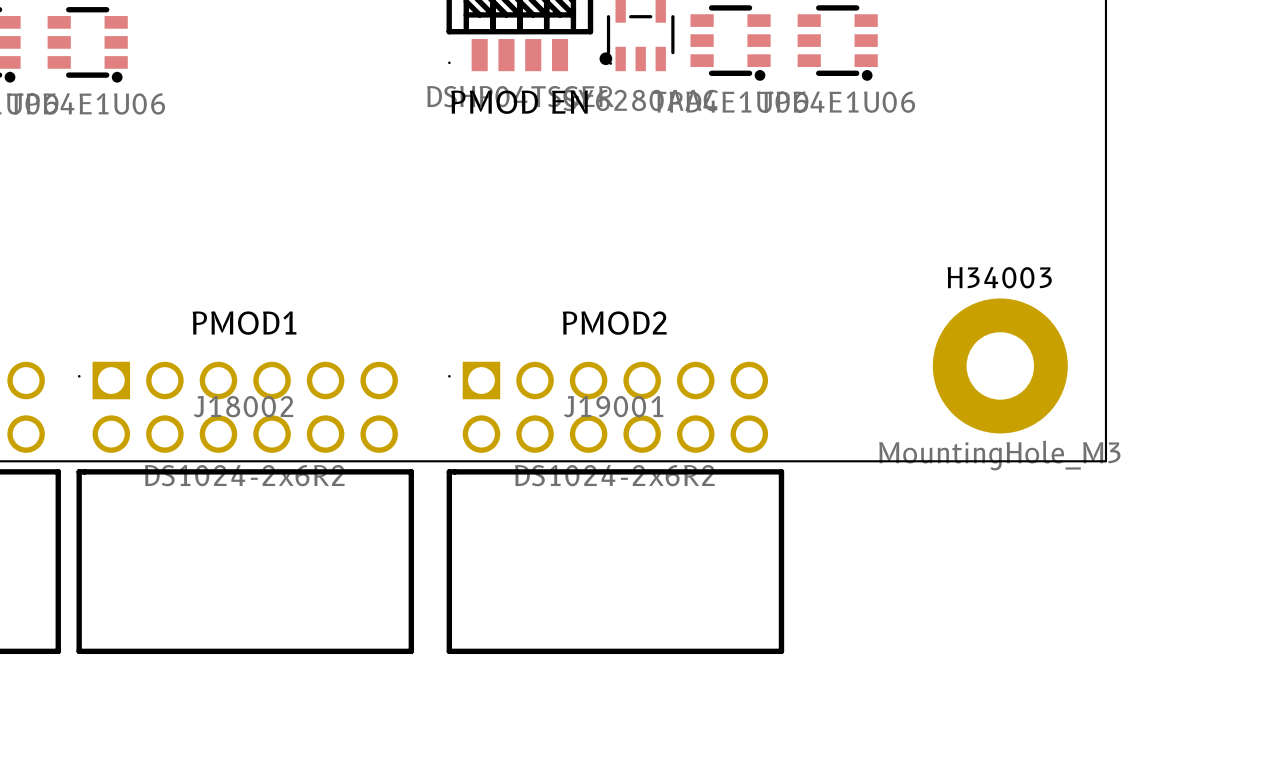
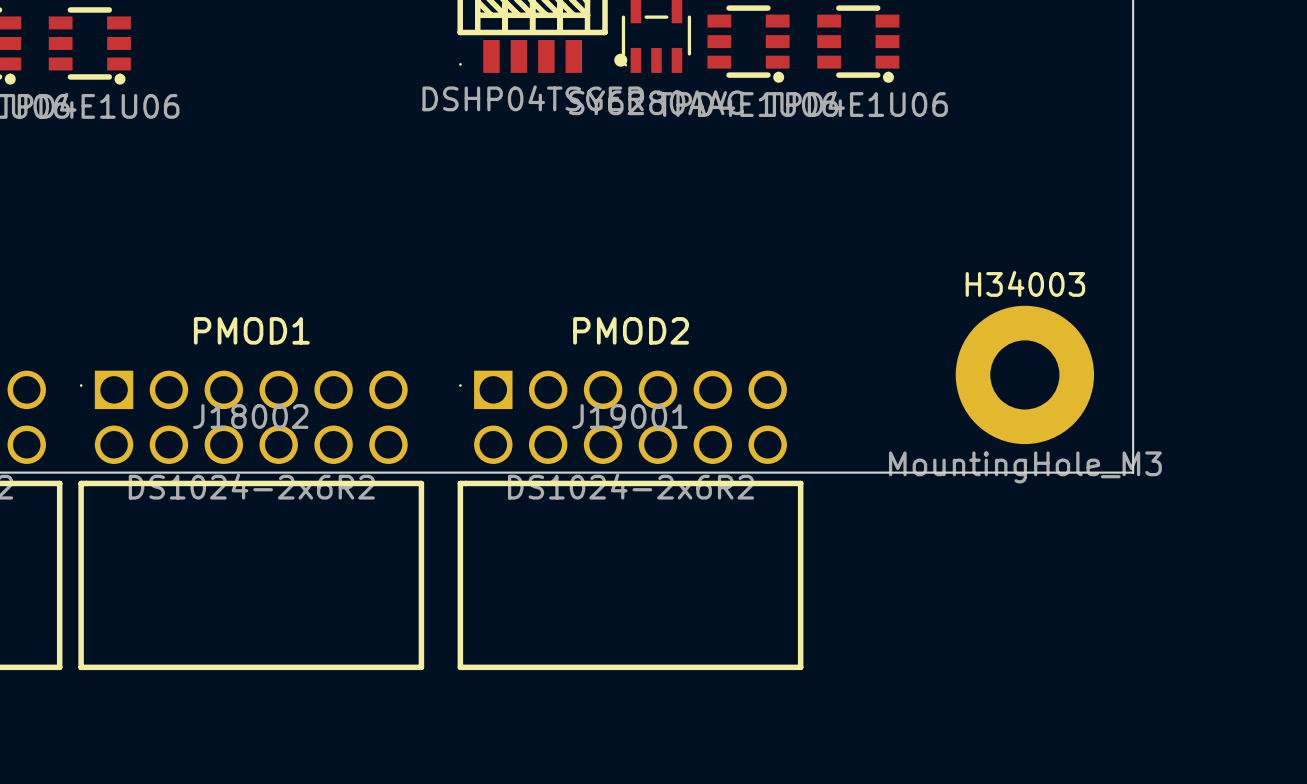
text: PMOD EN (519, 102) -> none

